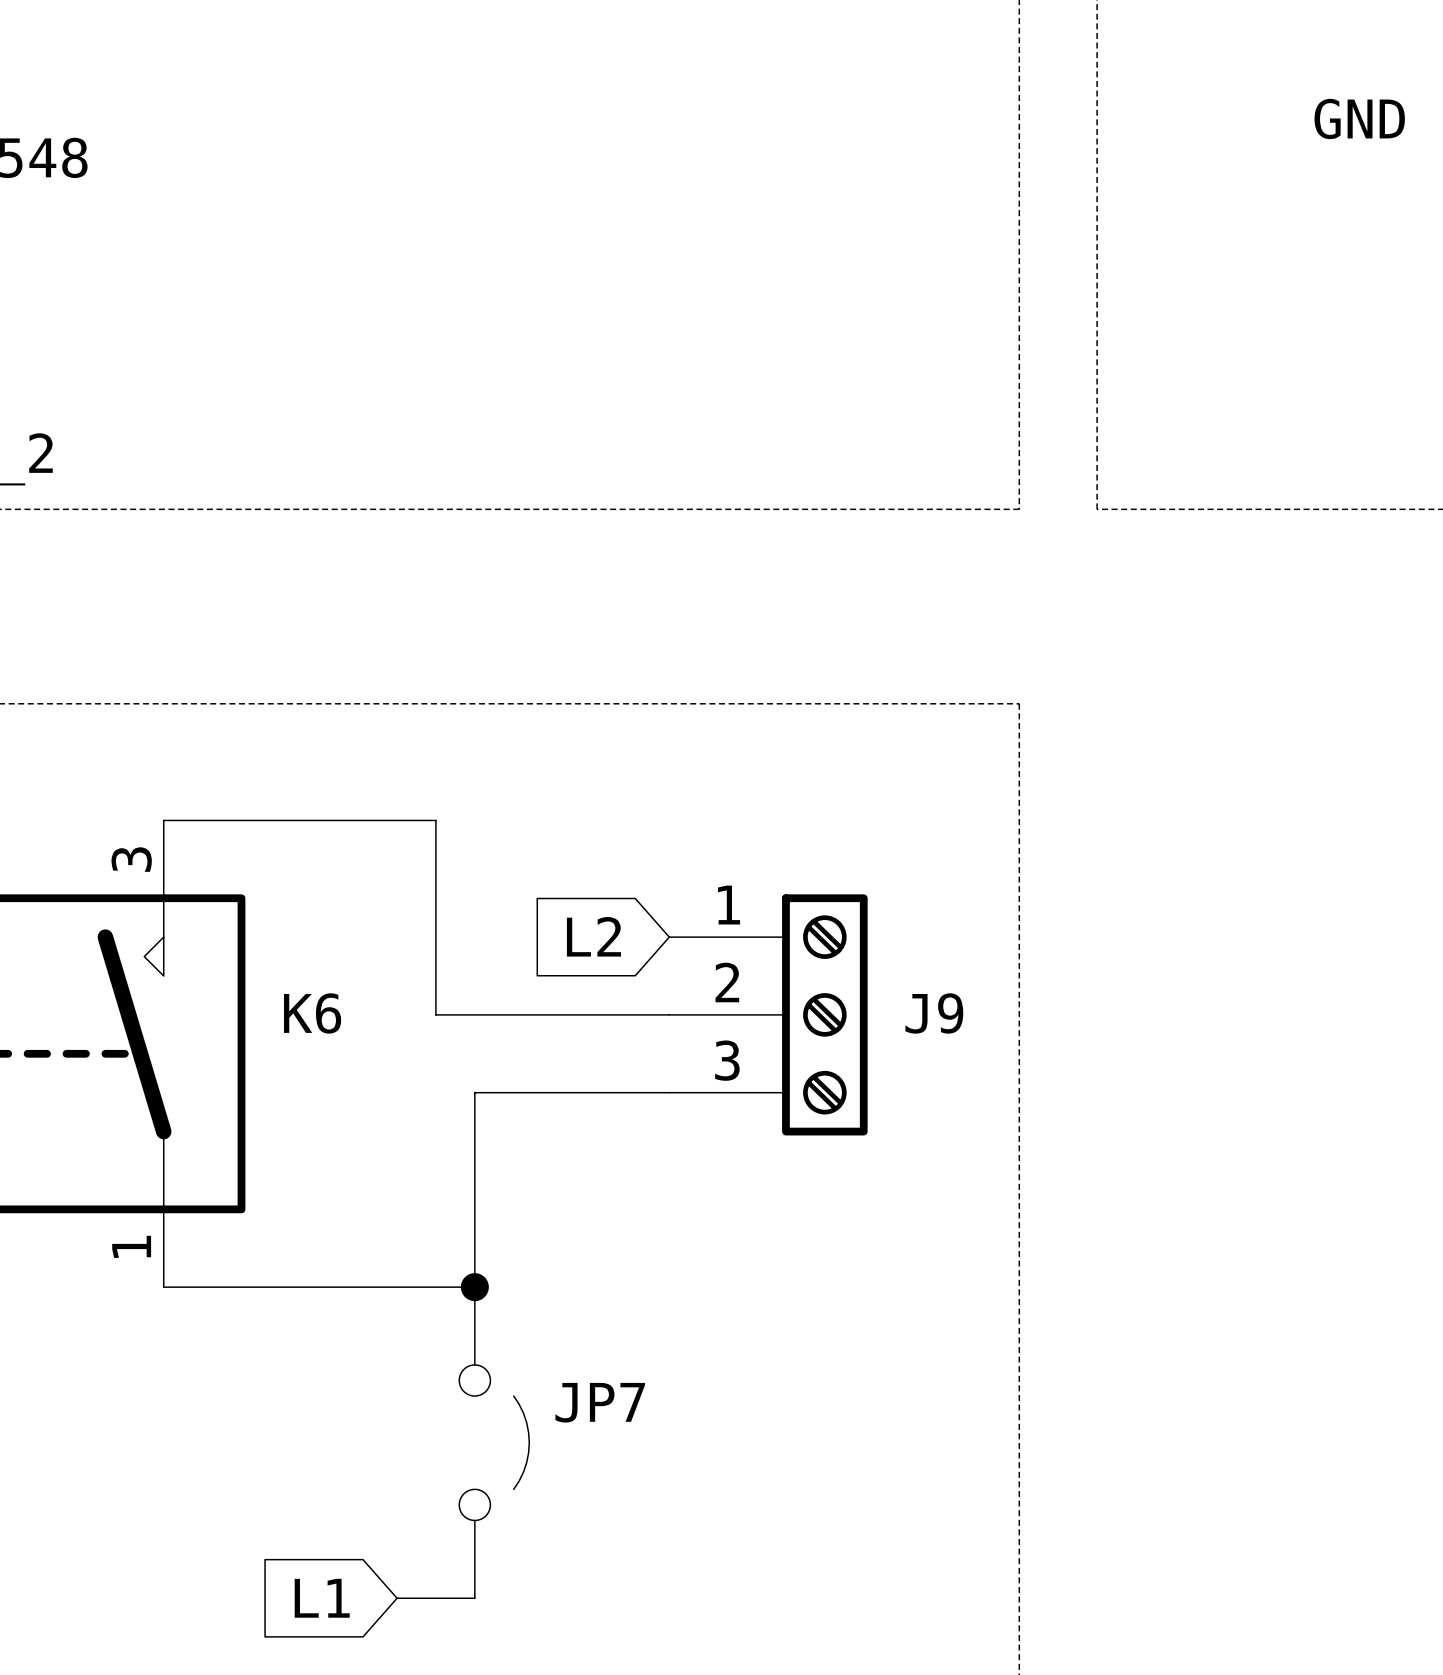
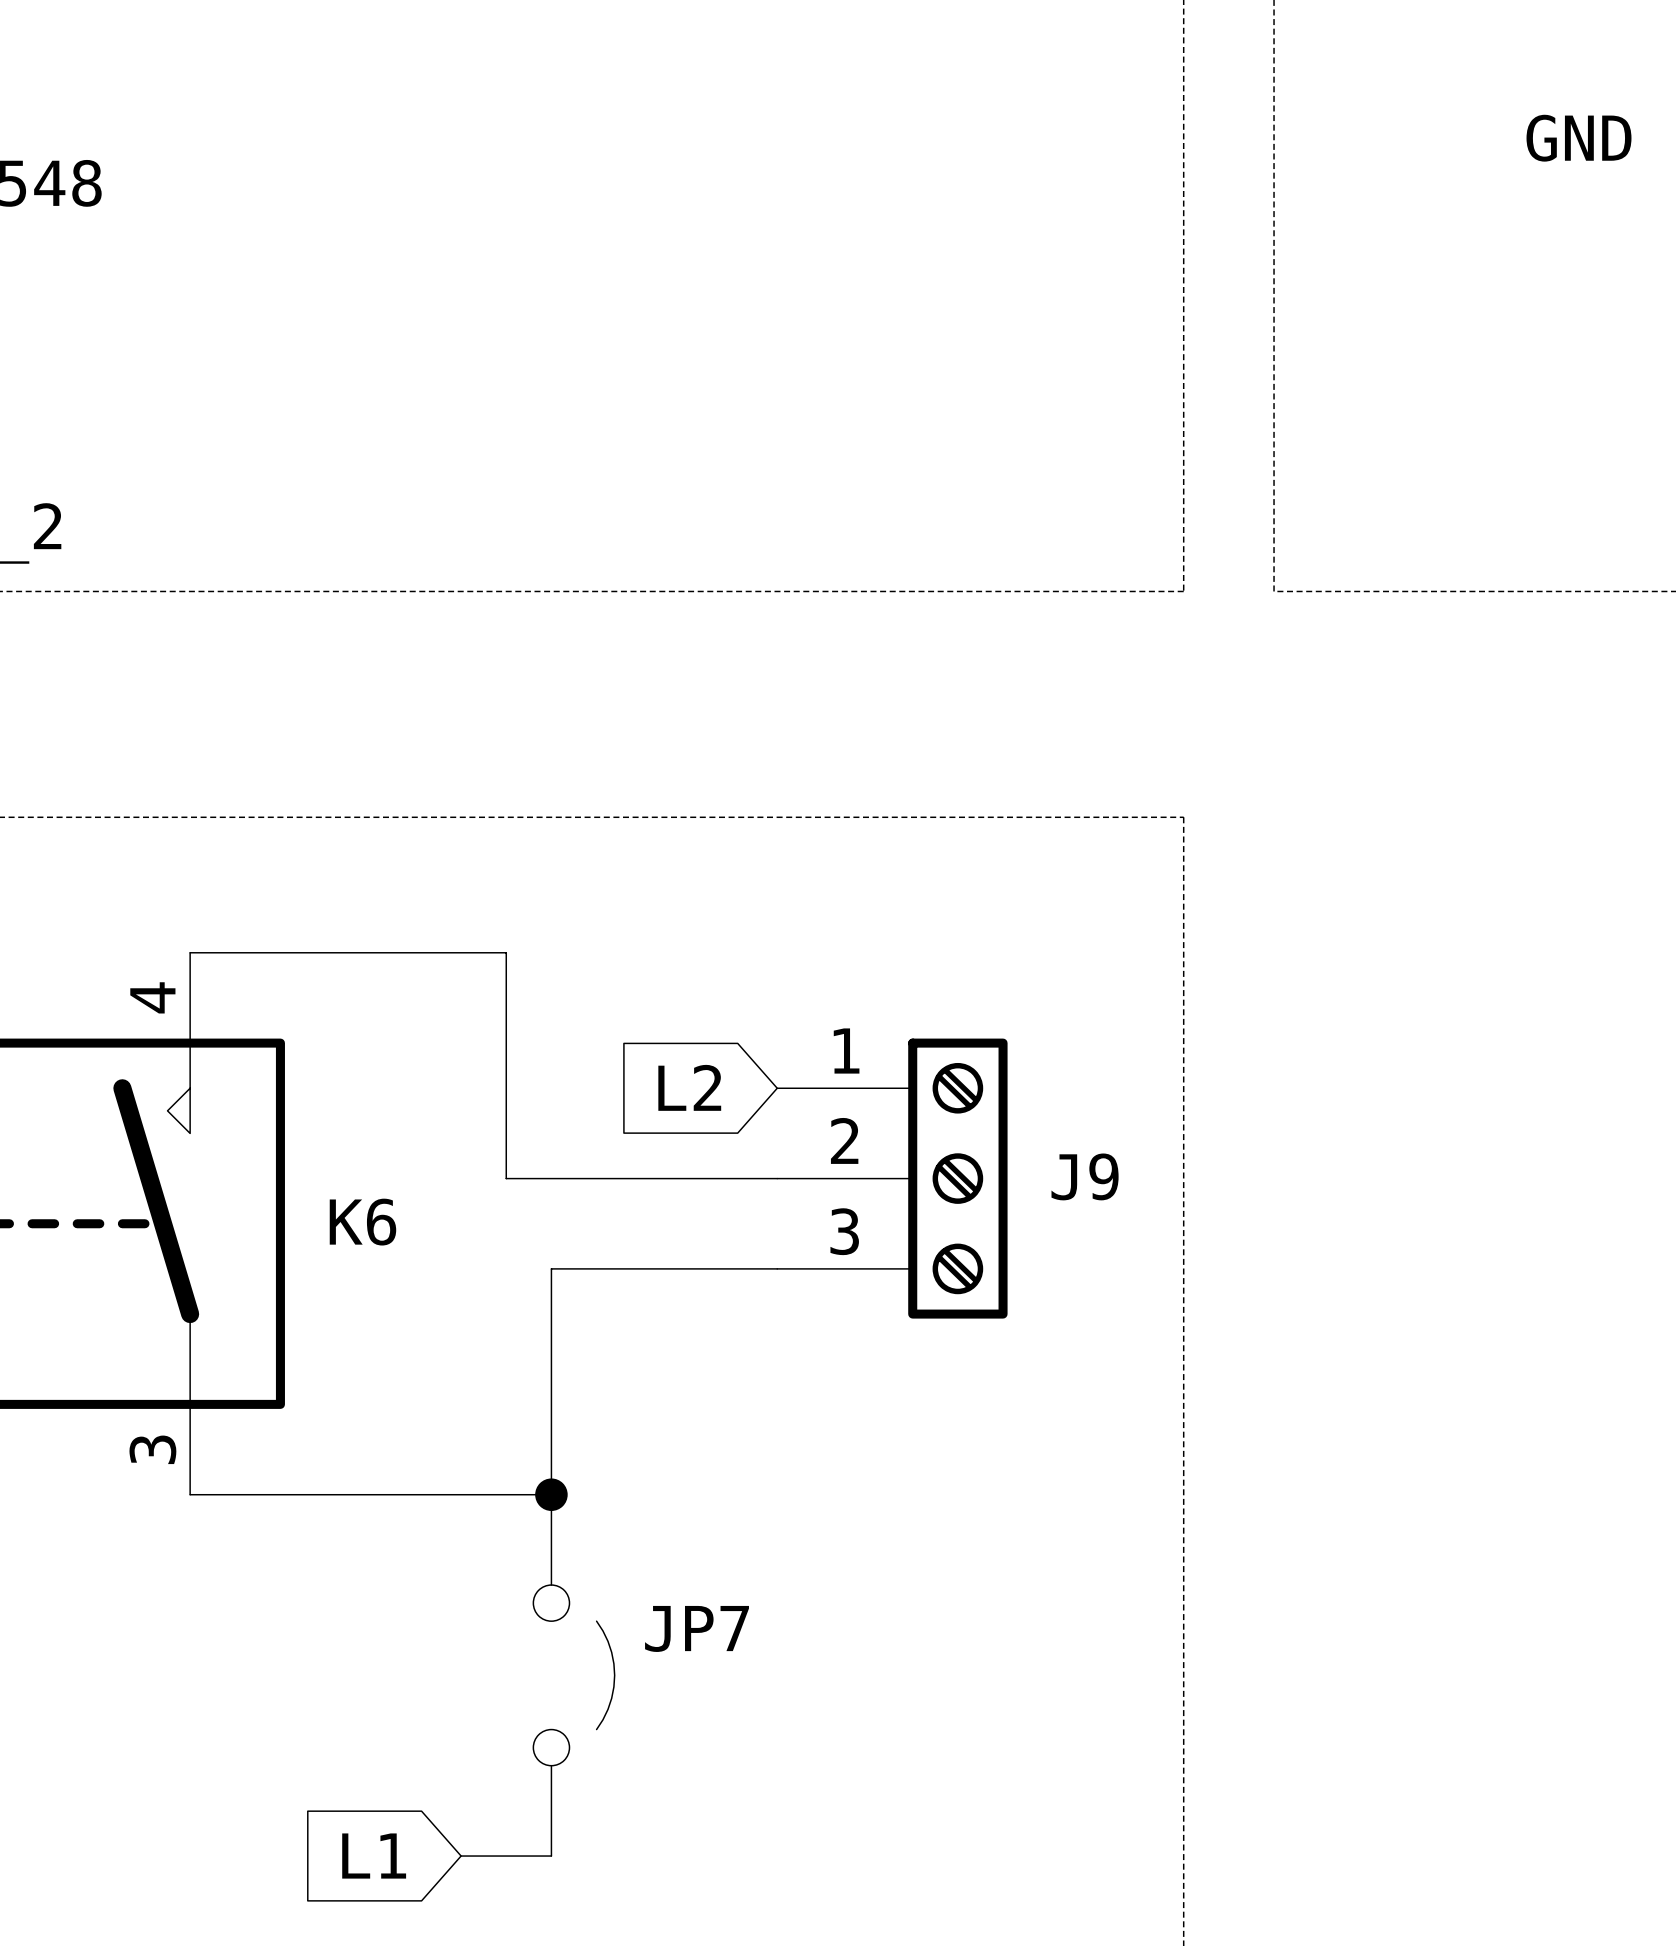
K6 pin number: 3 (131, 859) -> 4 (152, 997)
K6 name position: K6 (312, 1013) -> K6 (362, 1222)
K6 pin number: 1 (131, 1246) -> 3 (152, 1449)

